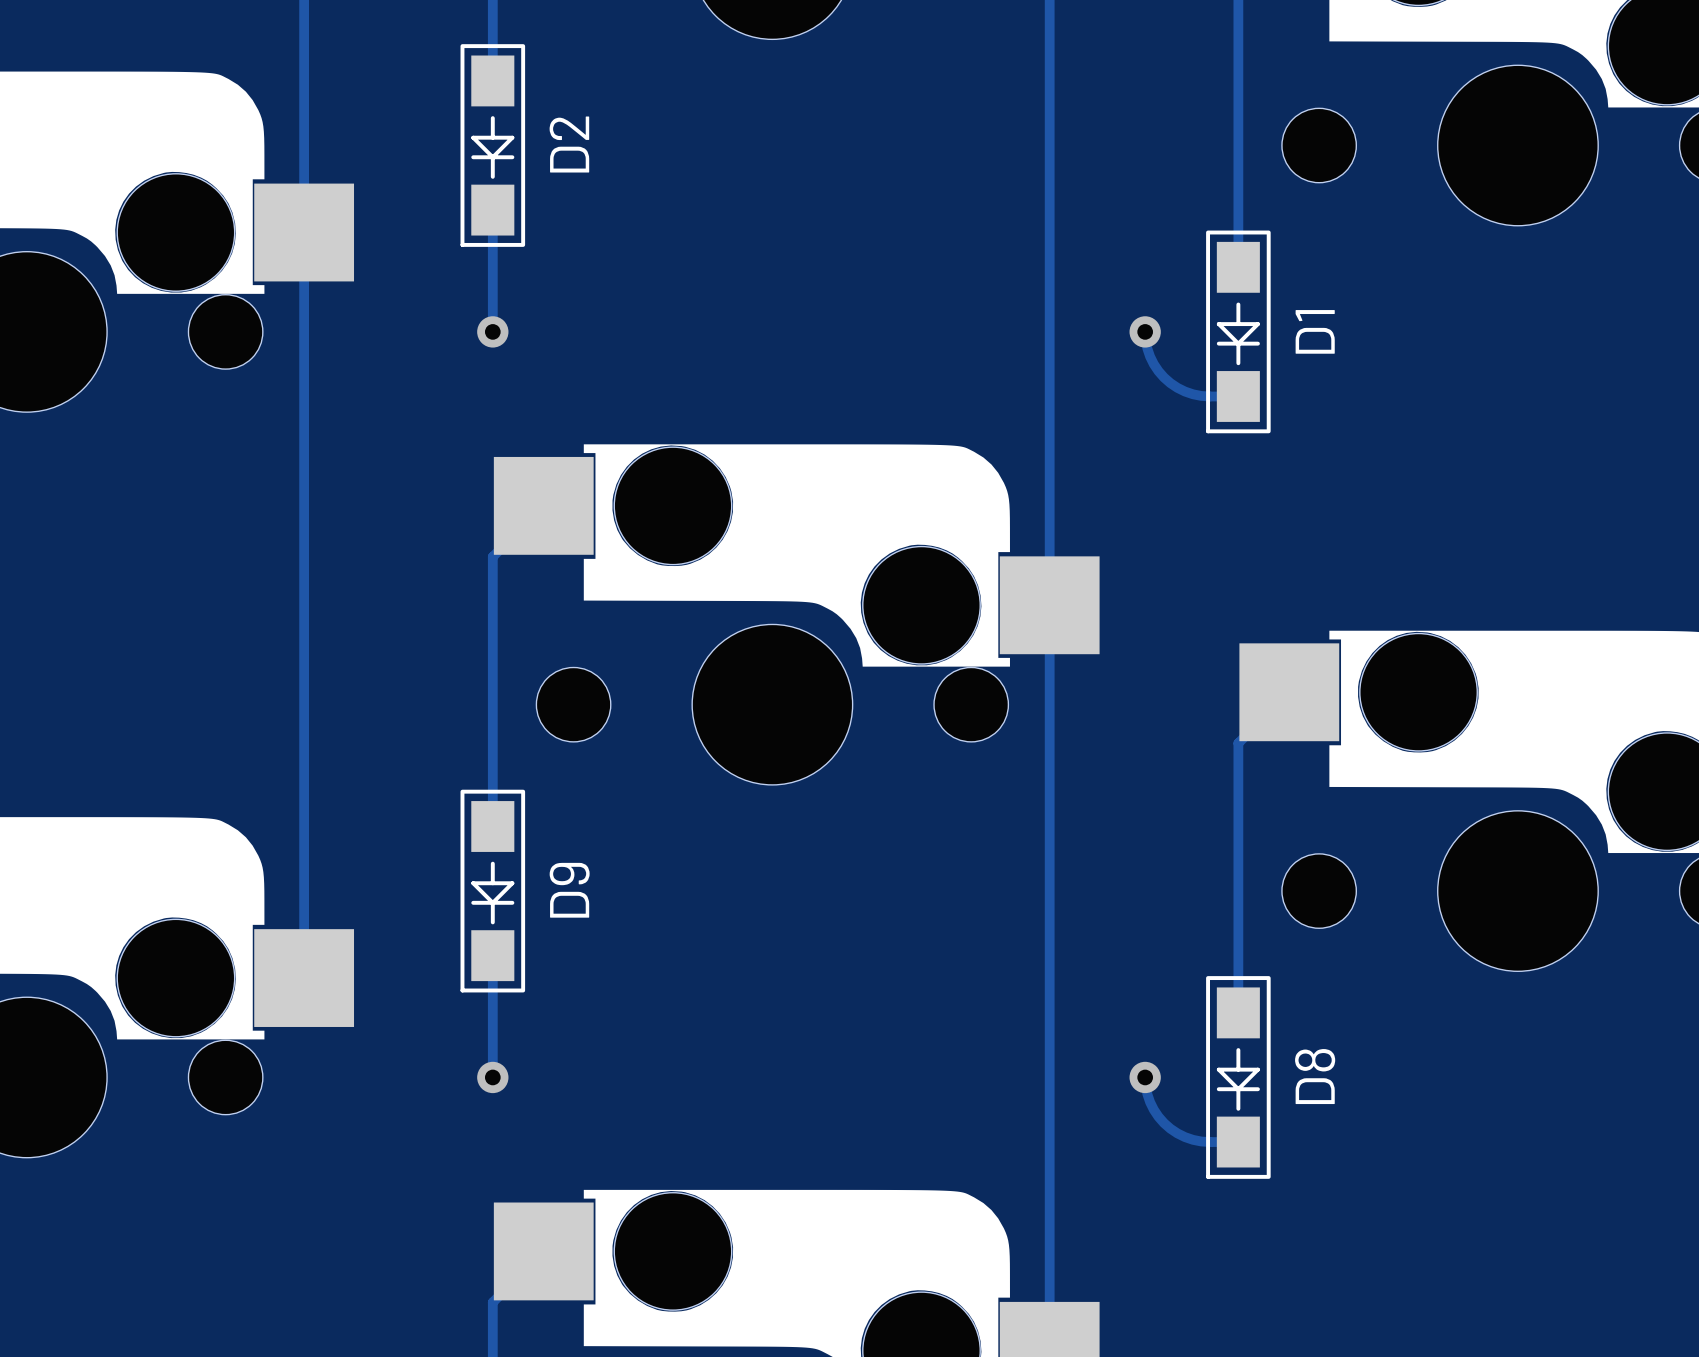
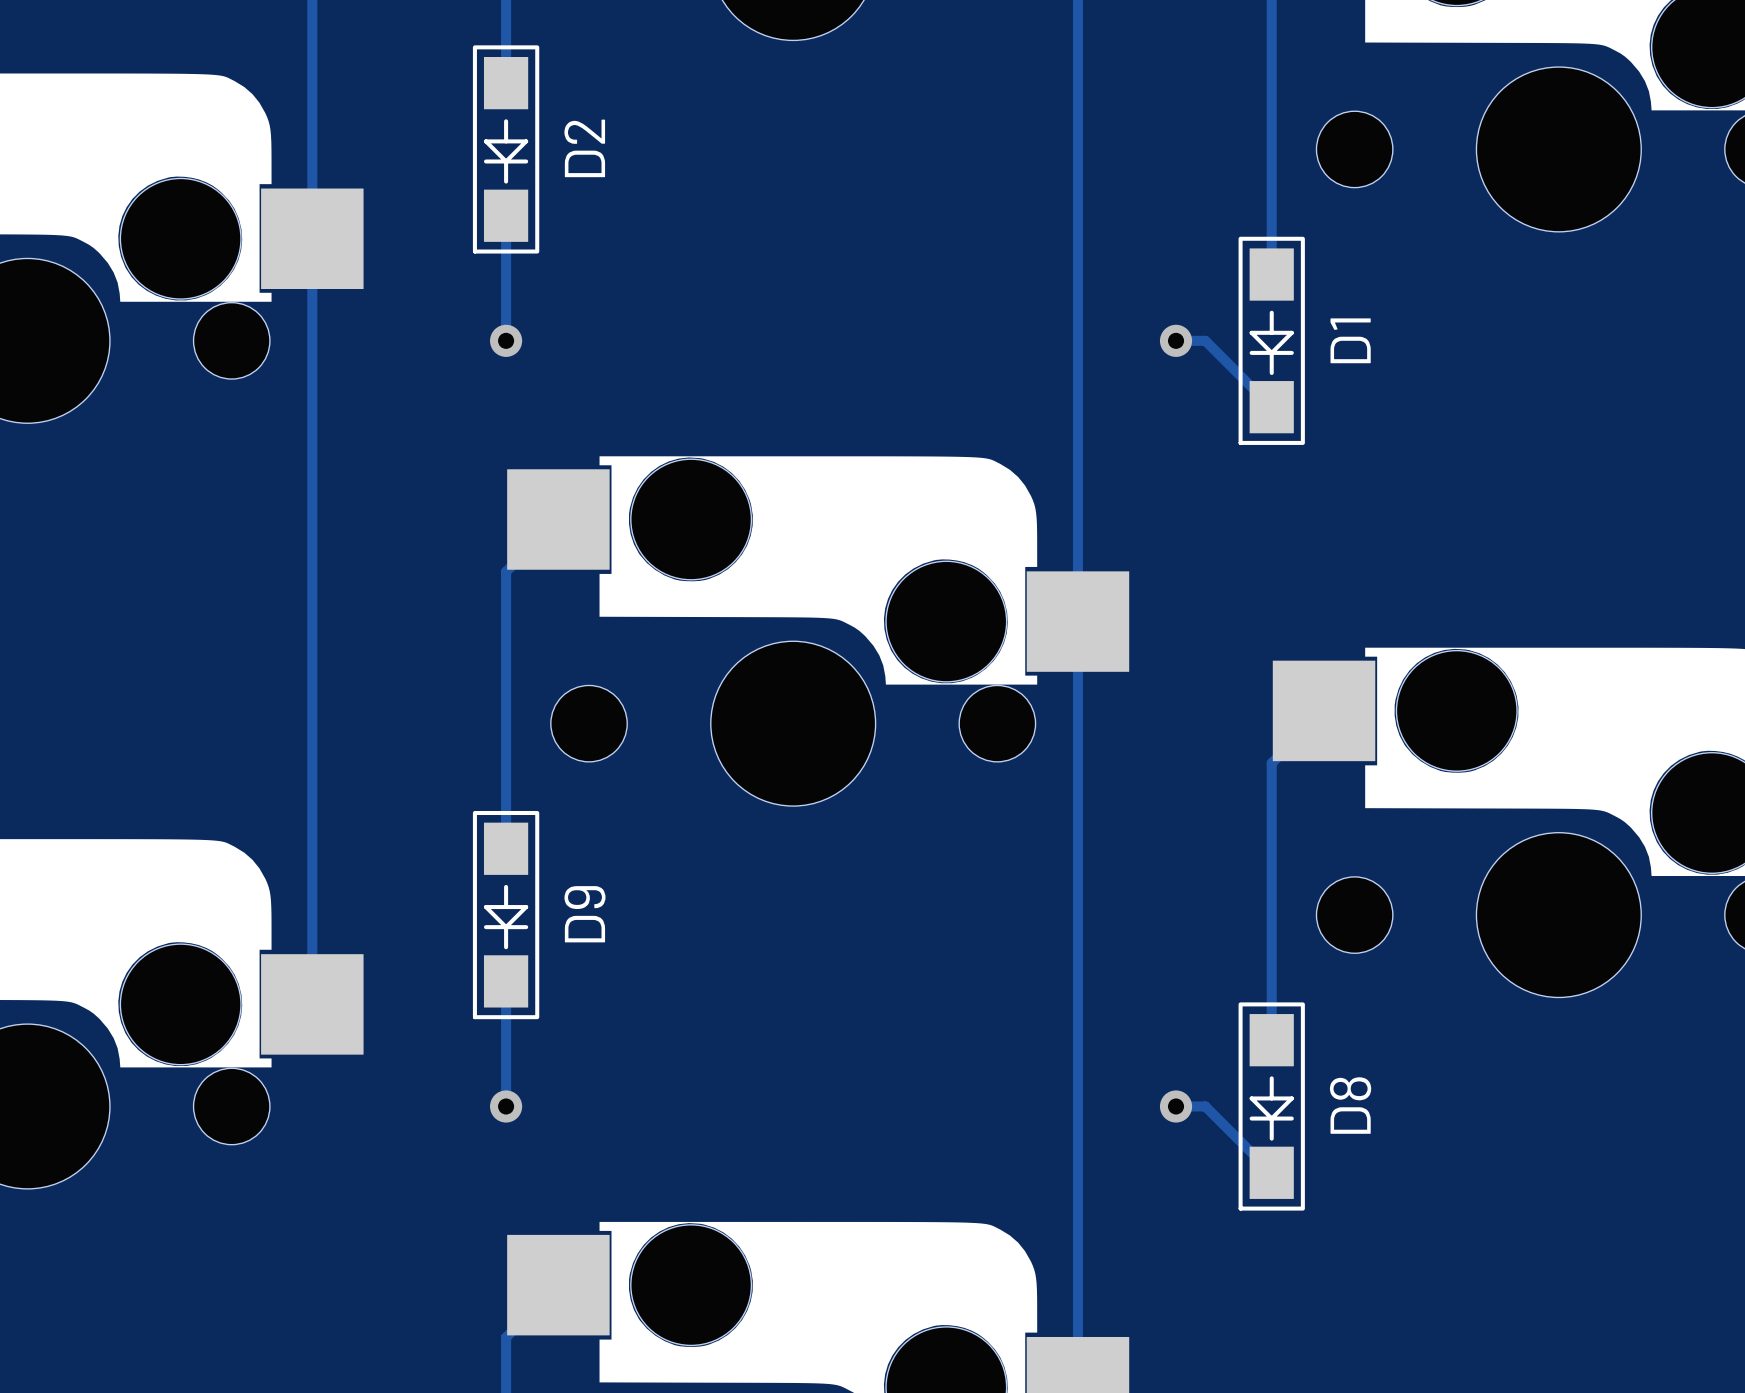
track: (1145, 331) (1147, 348) (1153, 364) (1170, 383) (1185, 391) (1201, 395) (1238, 396) -> (1176, 340) (1205, 340) (1271, 407)
track: (1145, 1077) (1150, 1102) (1158, 1116) (1170, 1128) (1185, 1137) (1201, 1141) (1238, 1142) -> (1176, 1106) (1205, 1106) (1271, 1172)

